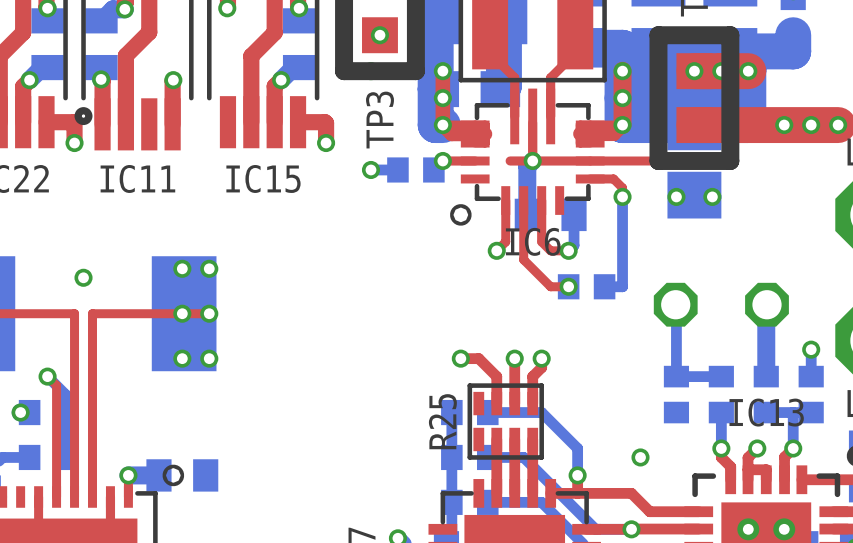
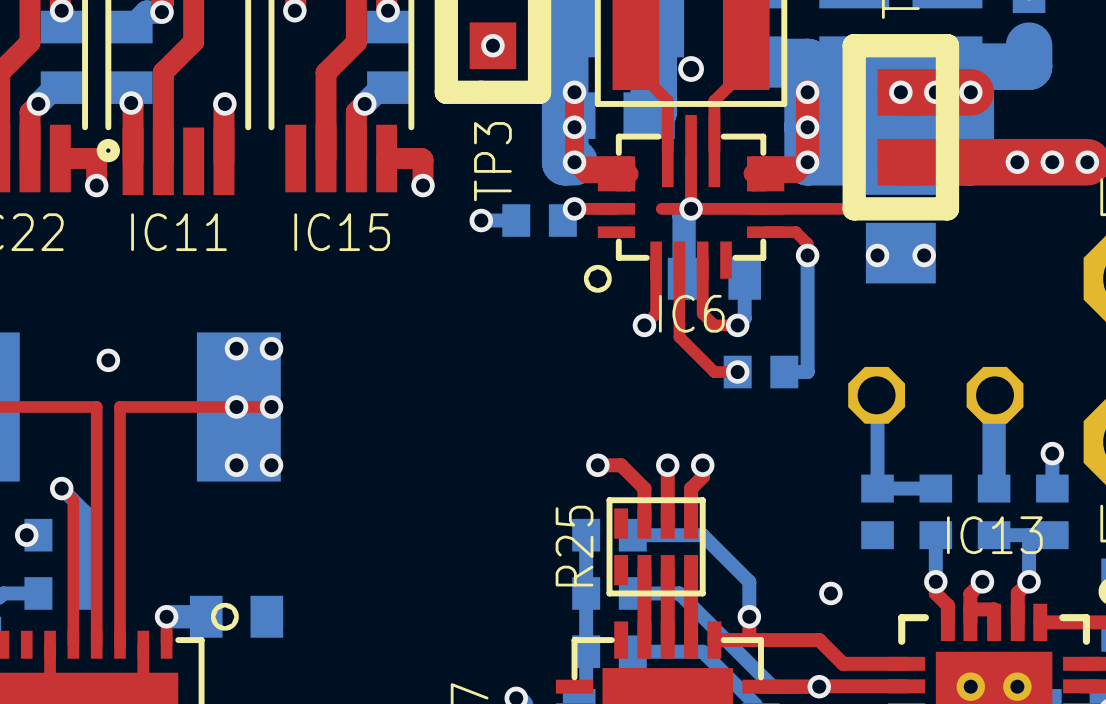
via: none -> (691, 69)

